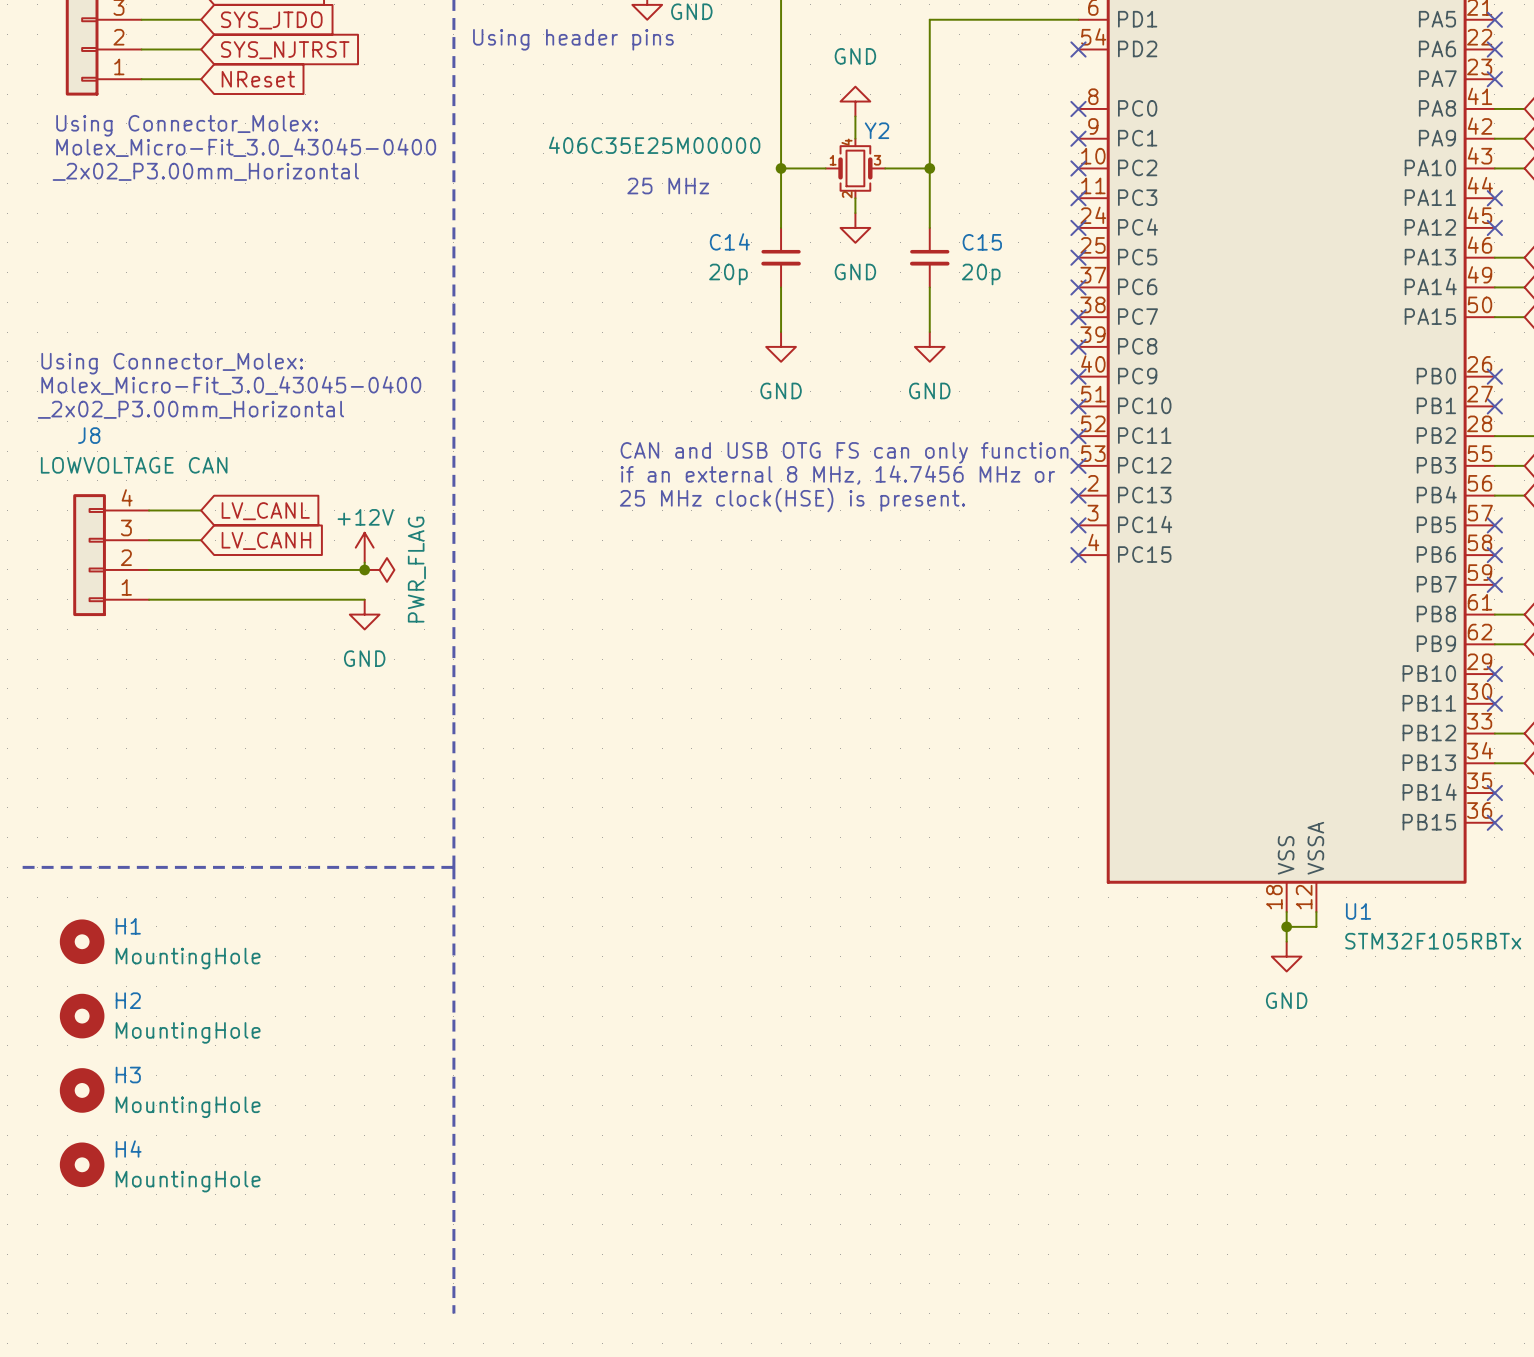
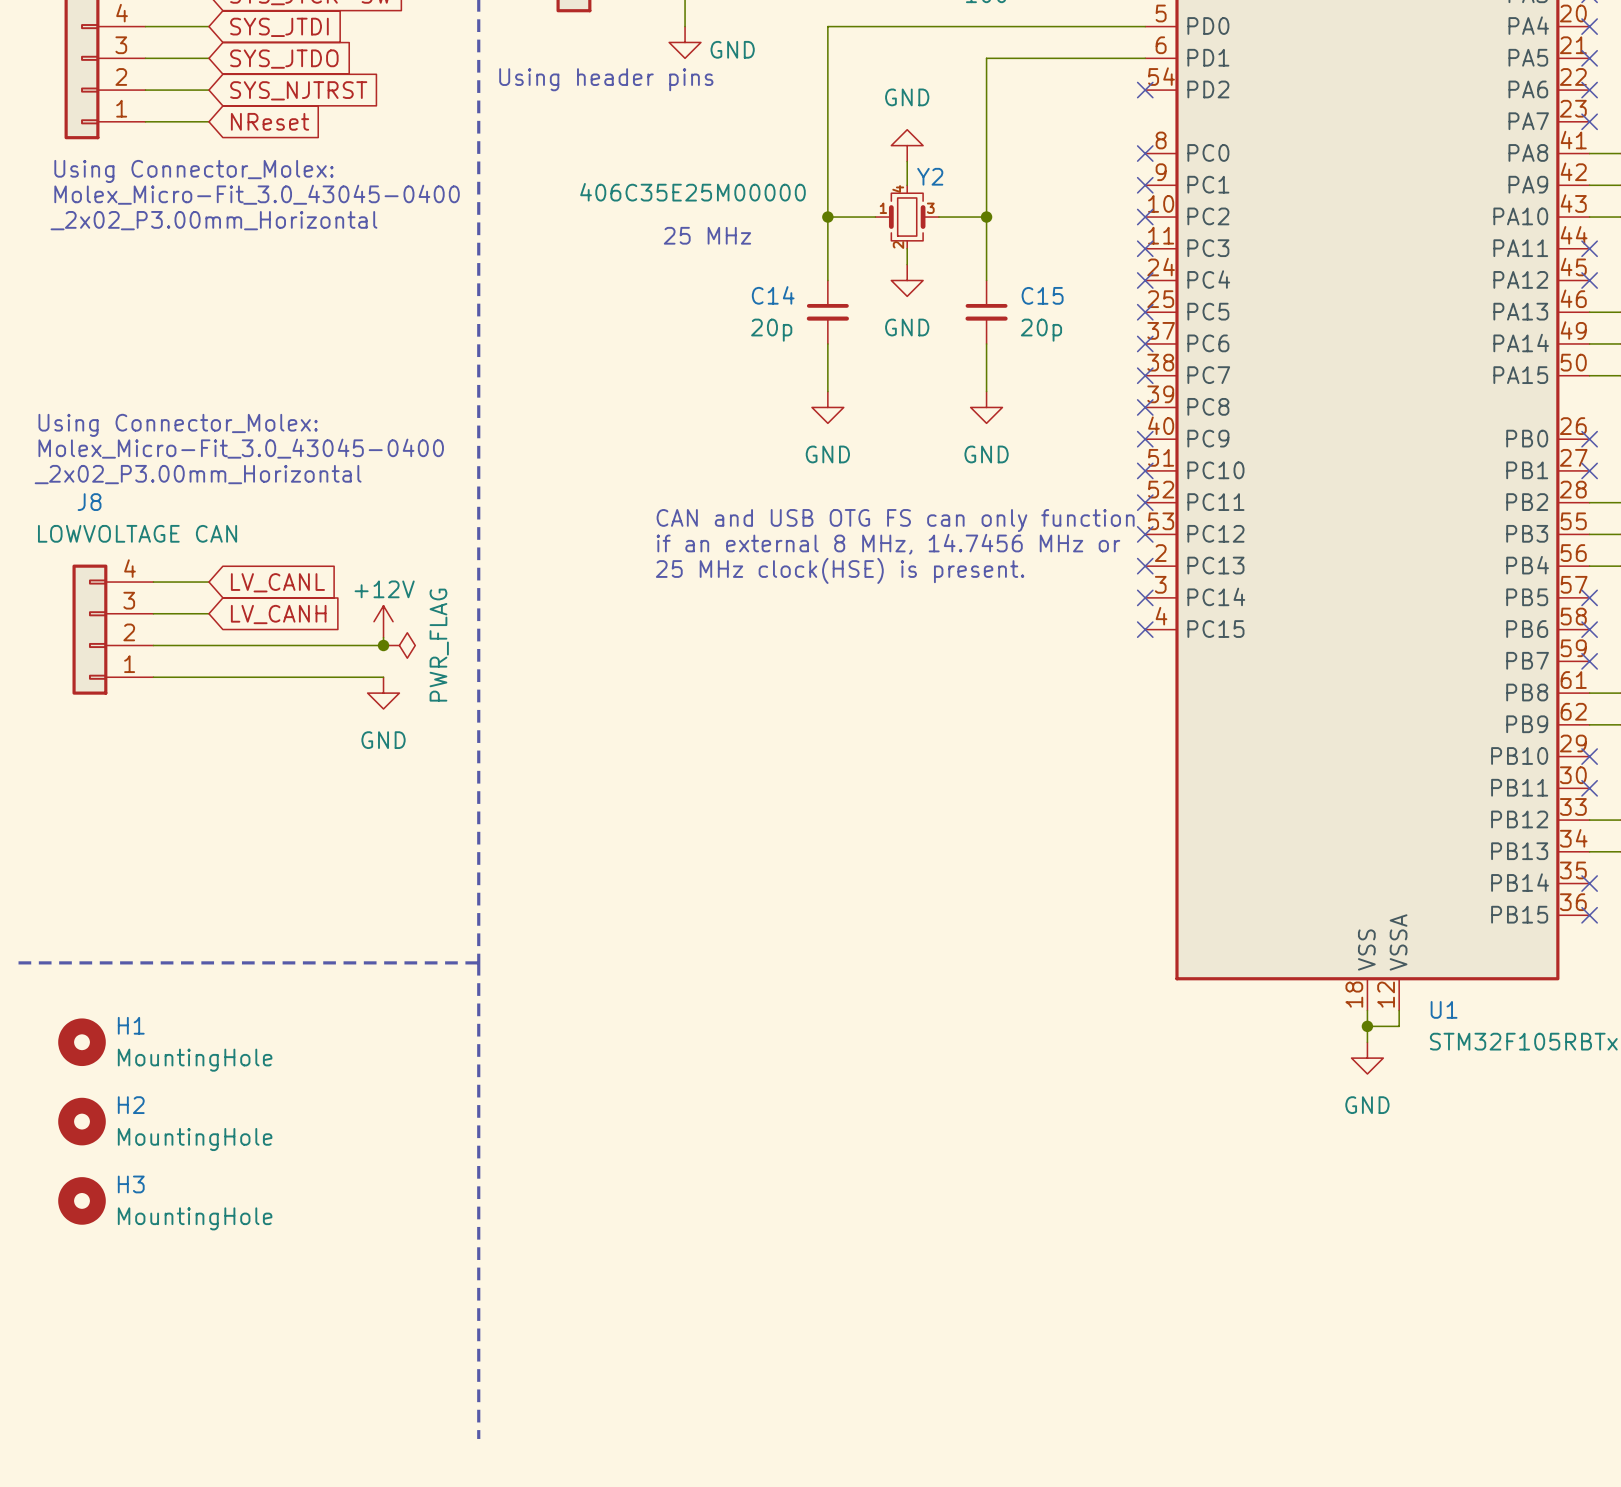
H4: MountingHole (82, 1164) -> none

